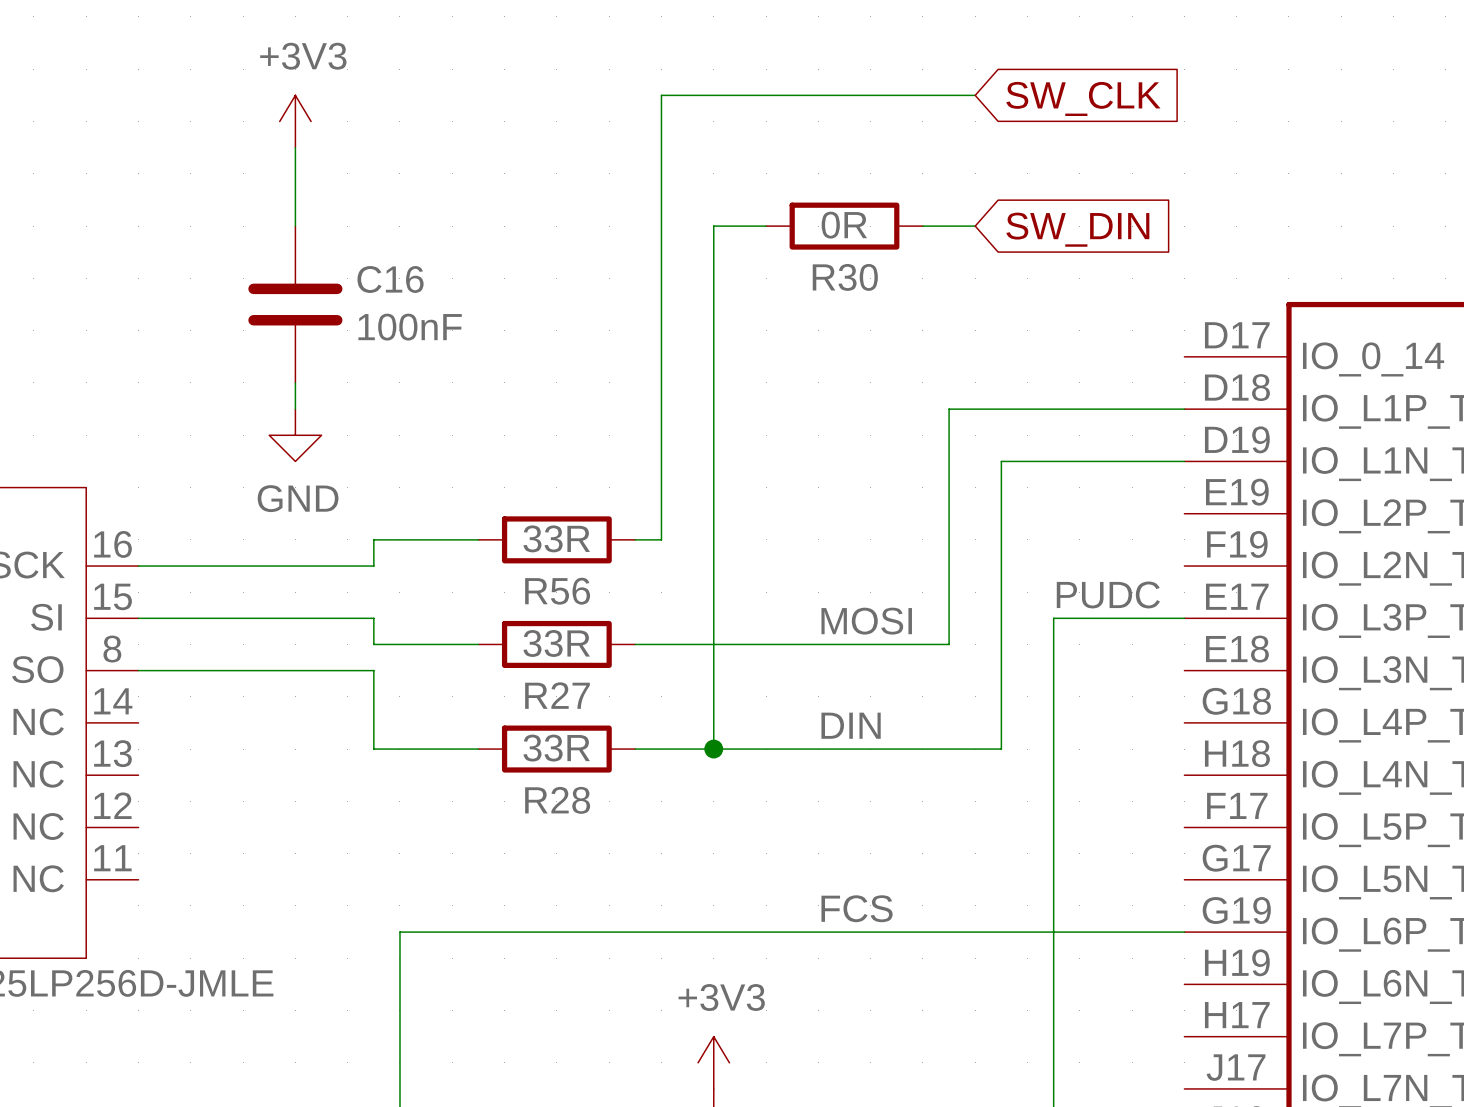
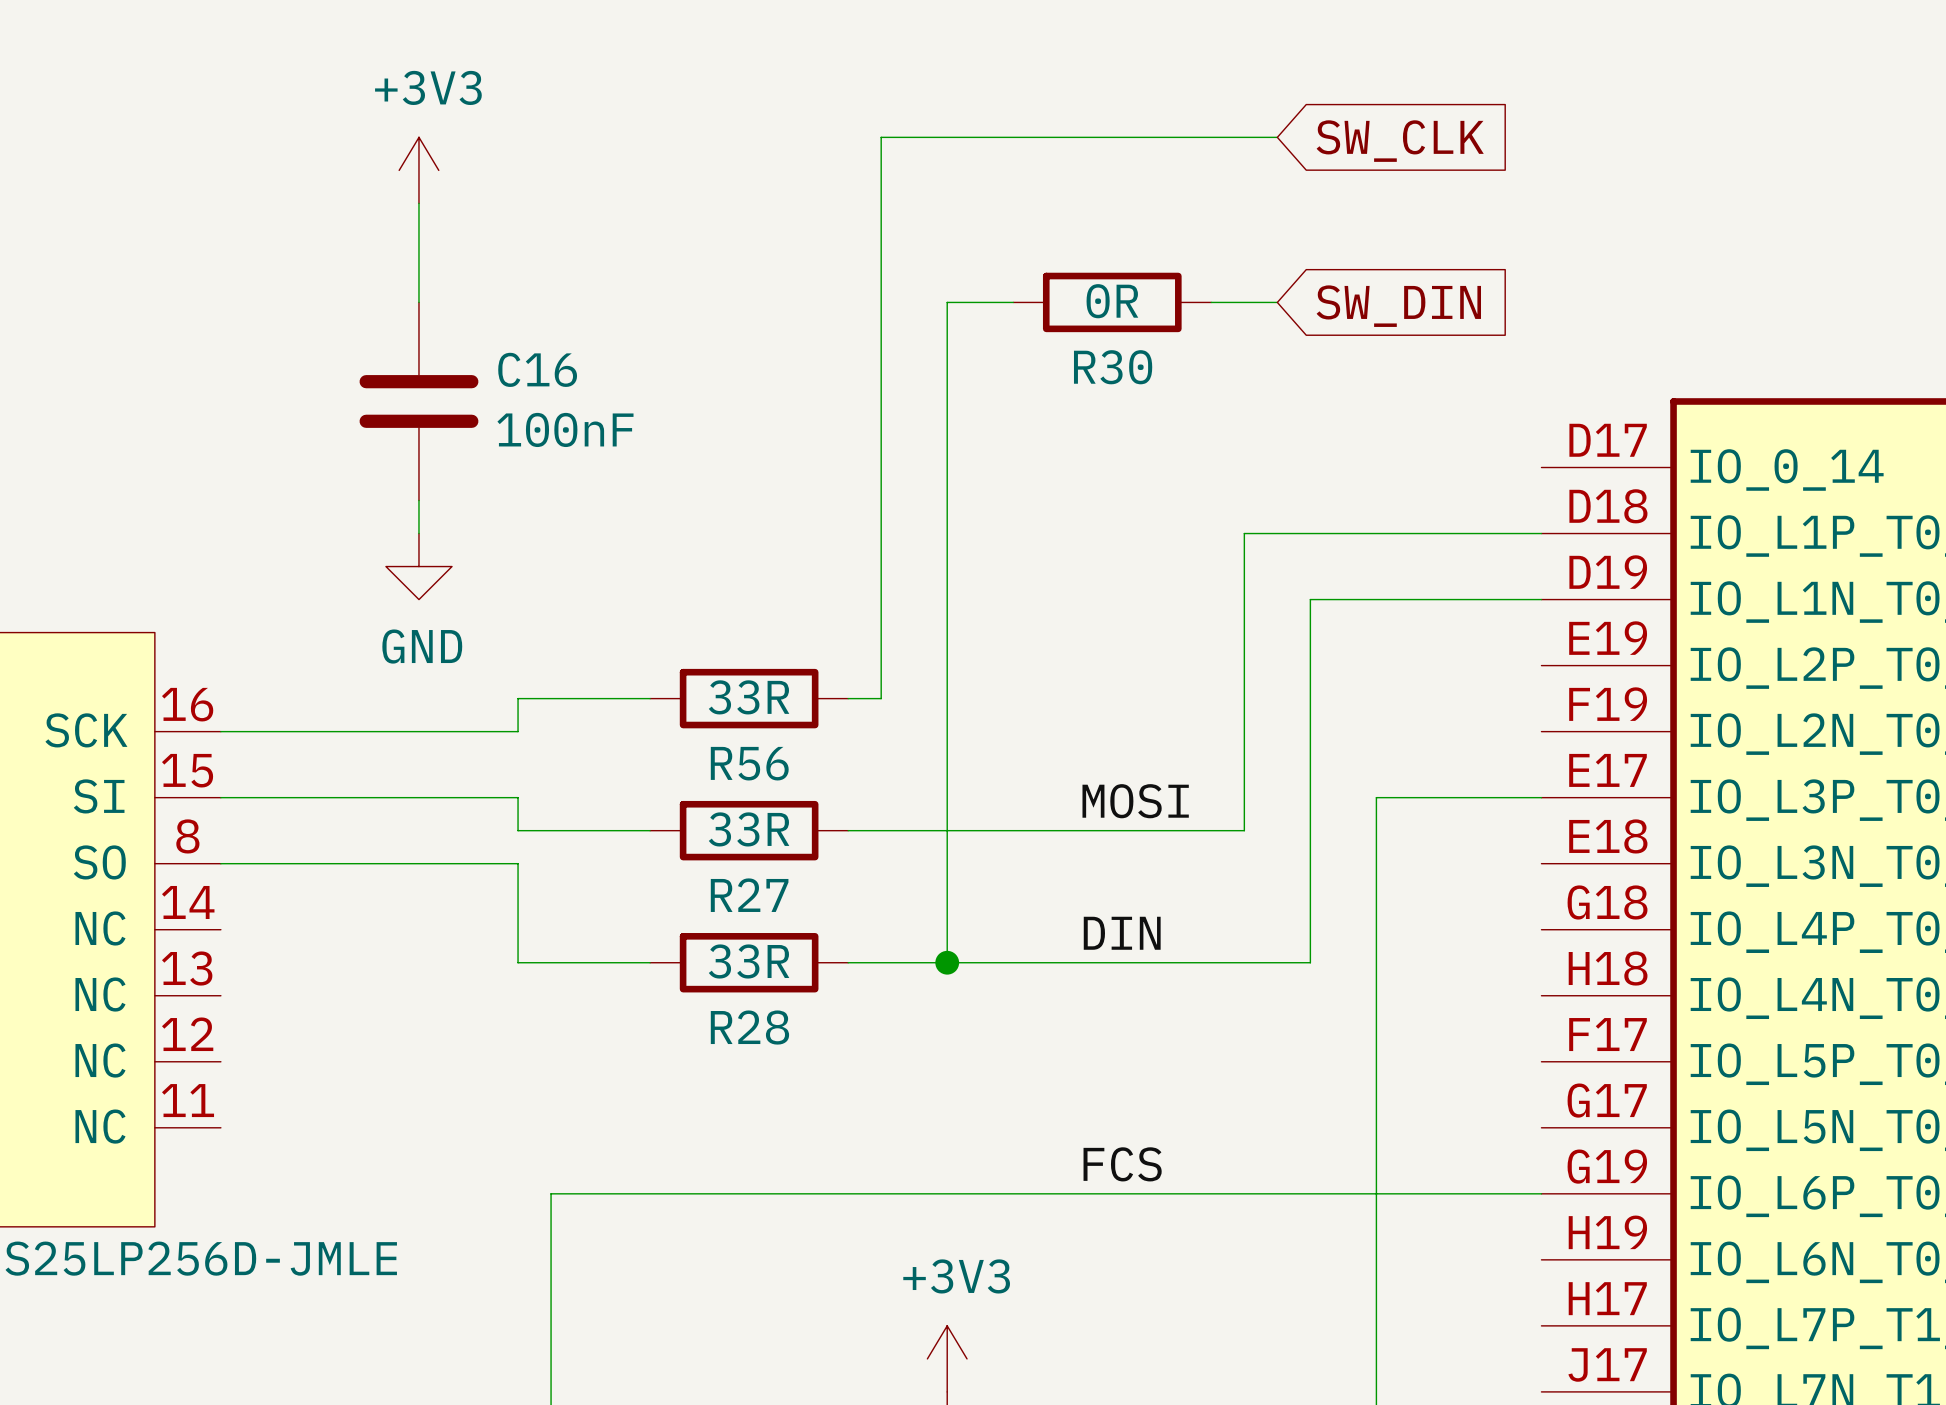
label: PUDC (1108, 594) -> none

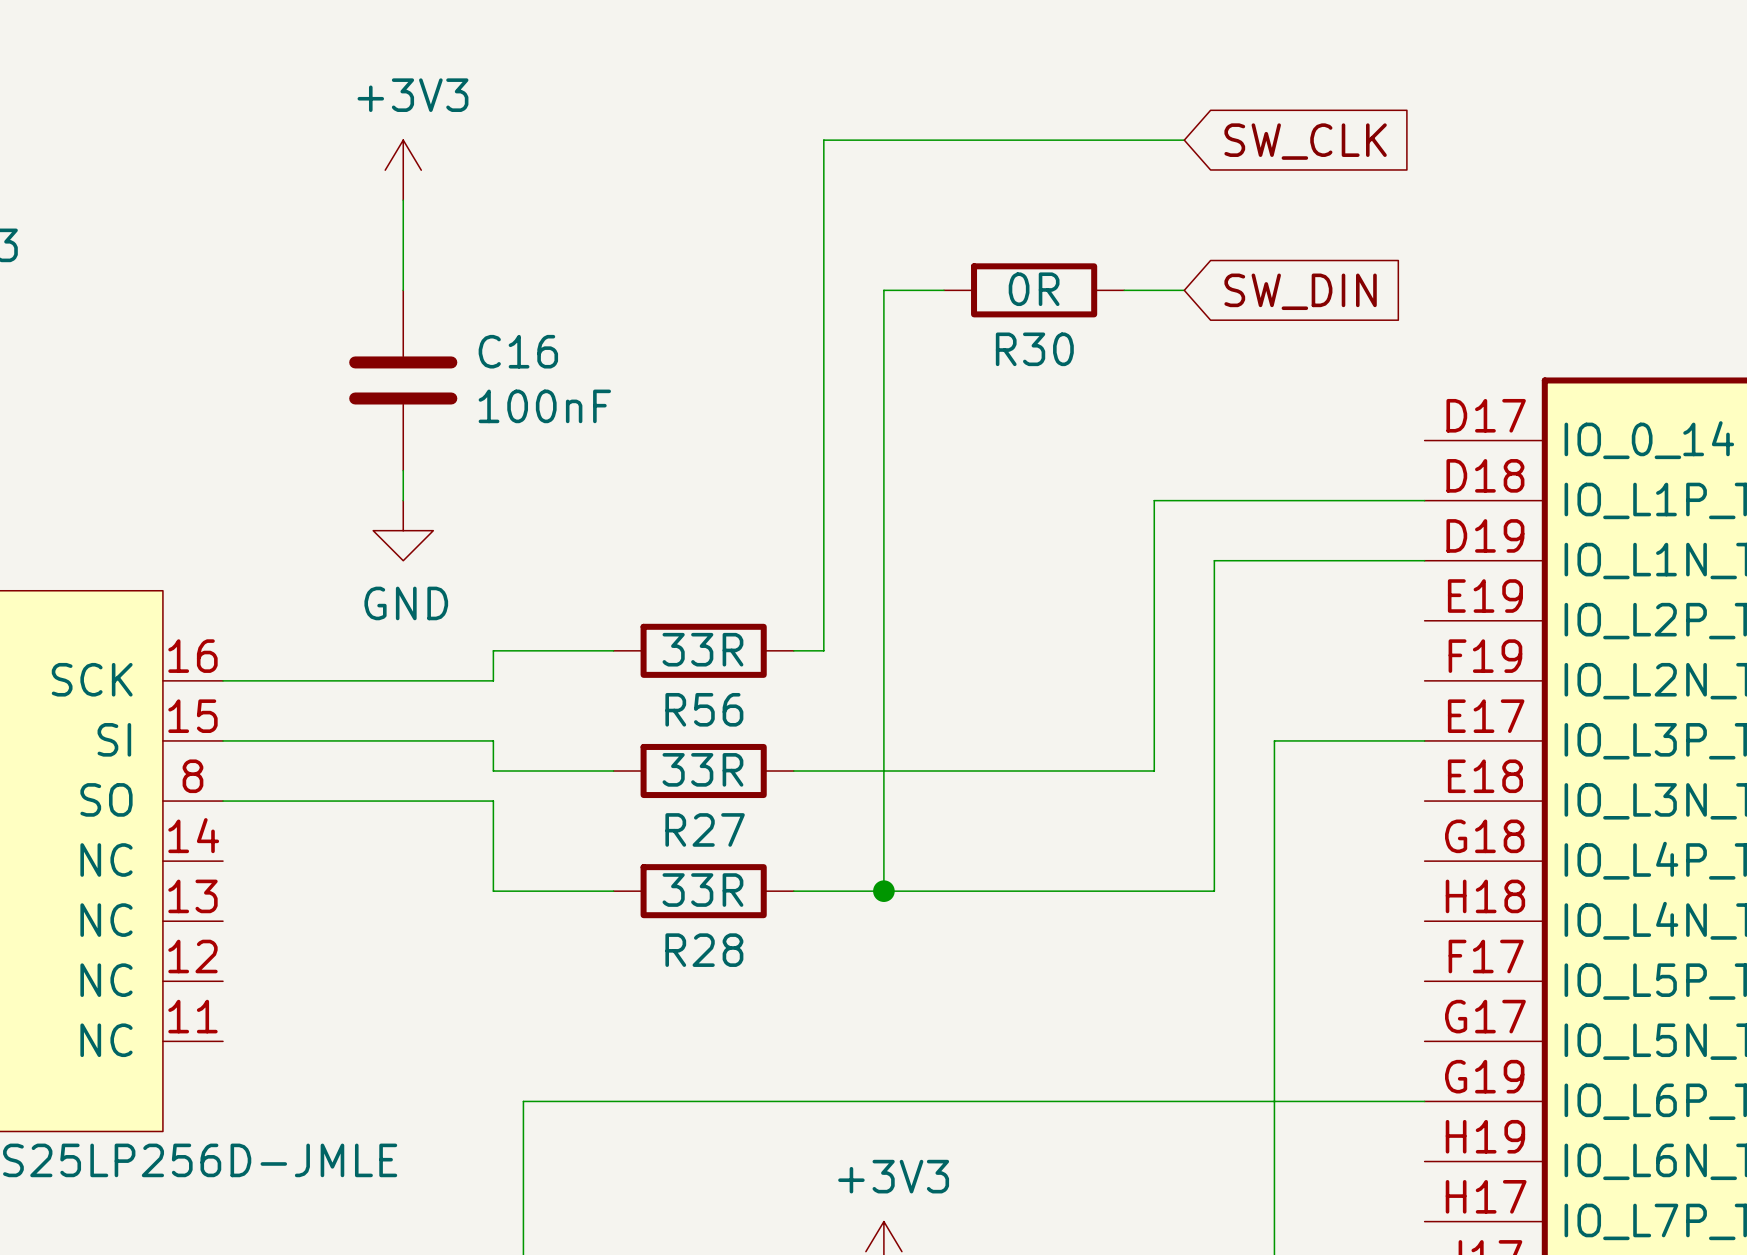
label: MOSI (1135, 801) -> none
label: DIN (1122, 933) -> none
label: FCS (1122, 1164) -> none

